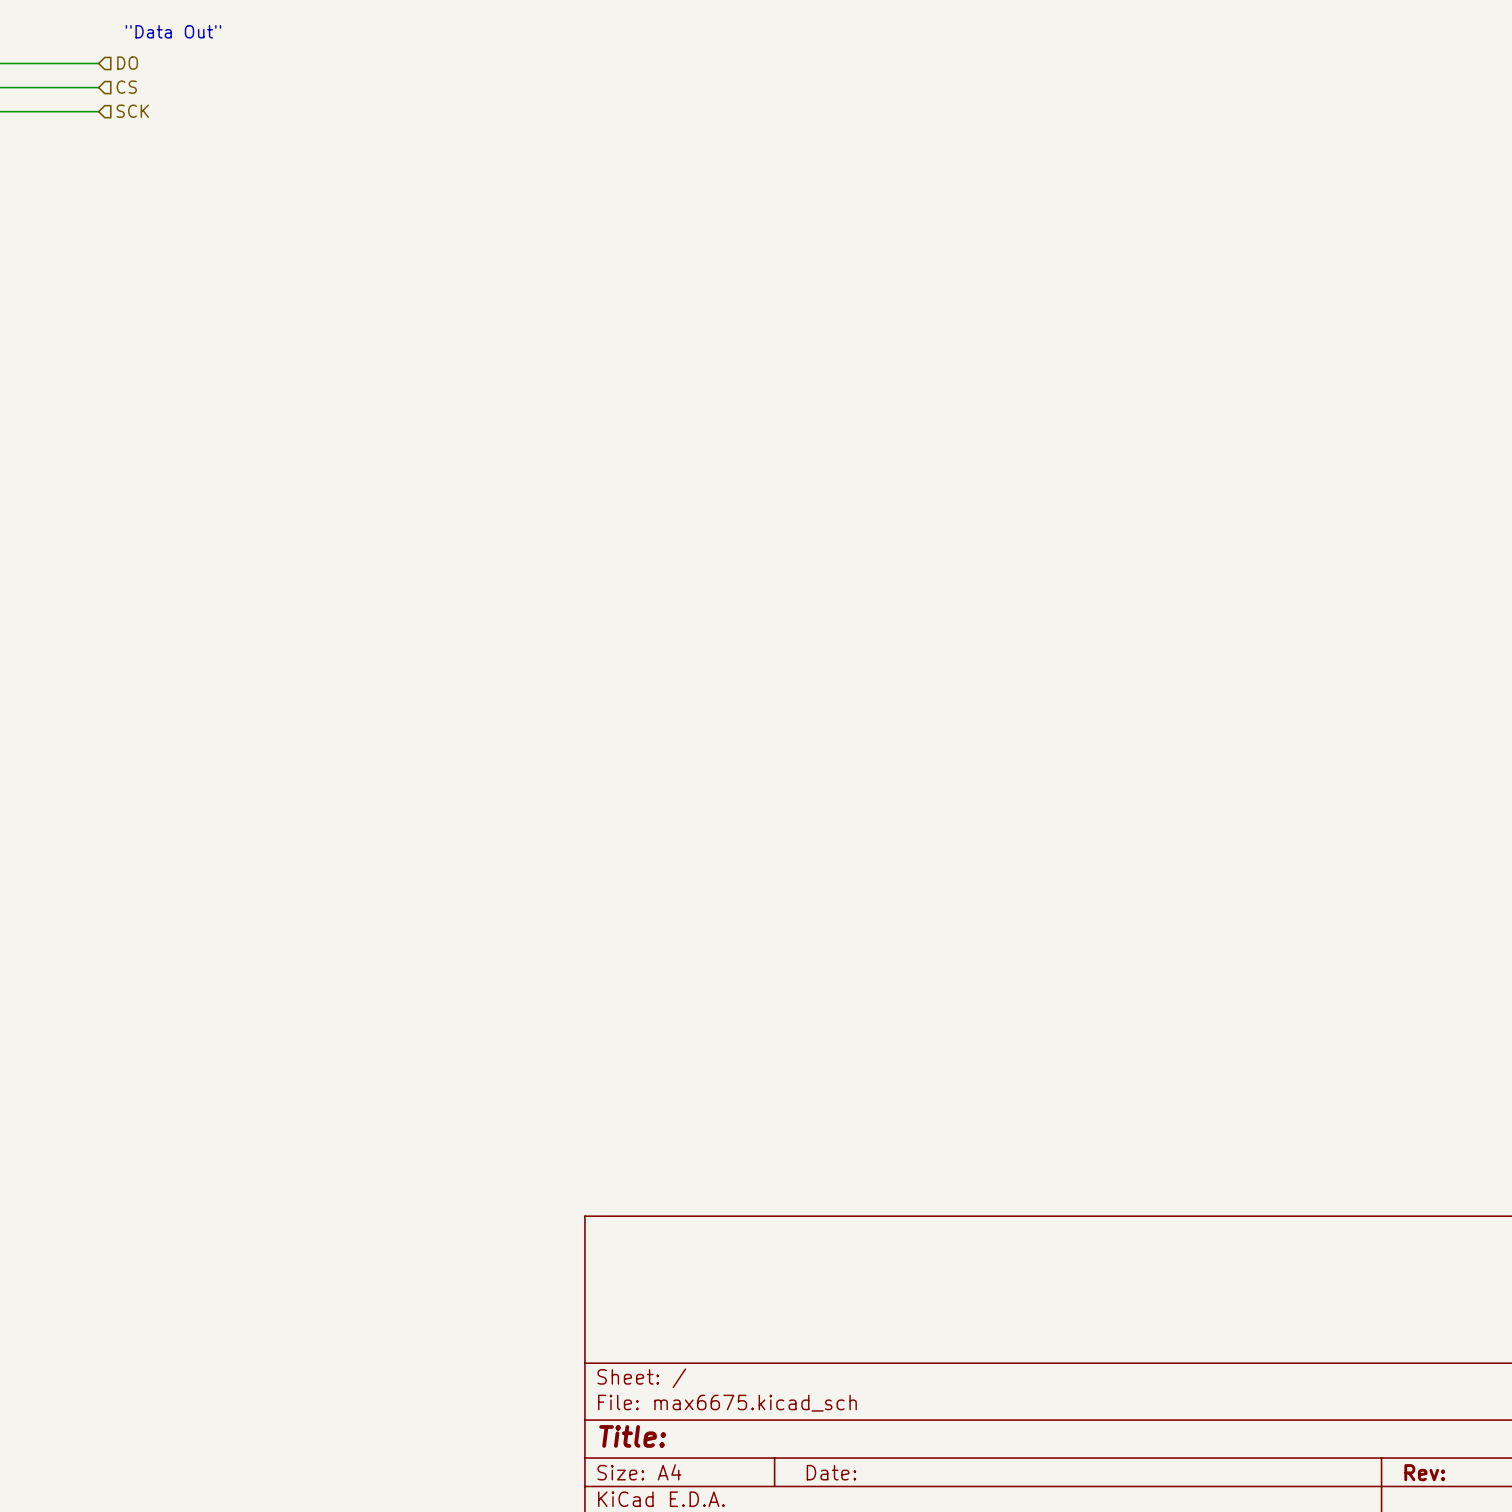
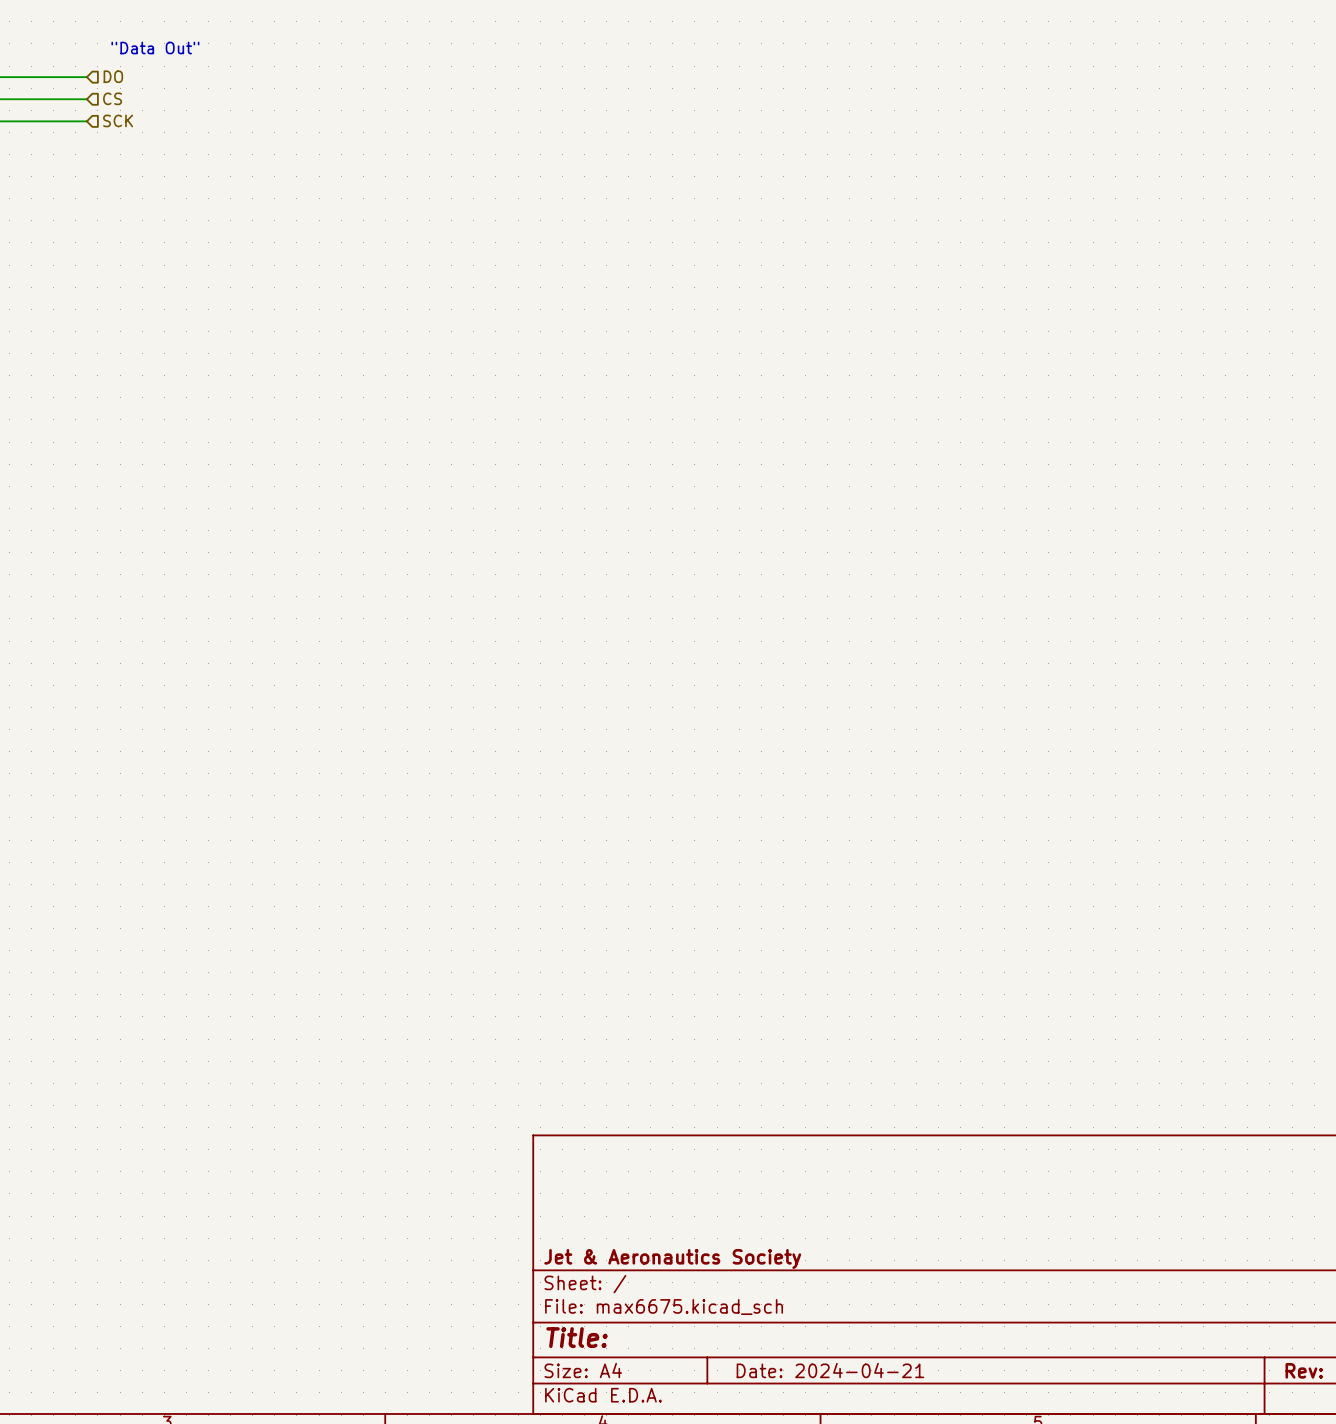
title block: none -> Jet & Aeronautics Society (672, 1258)
title block: Date: (831, 1472) -> Date: 2024-04-21 (830, 1370)

